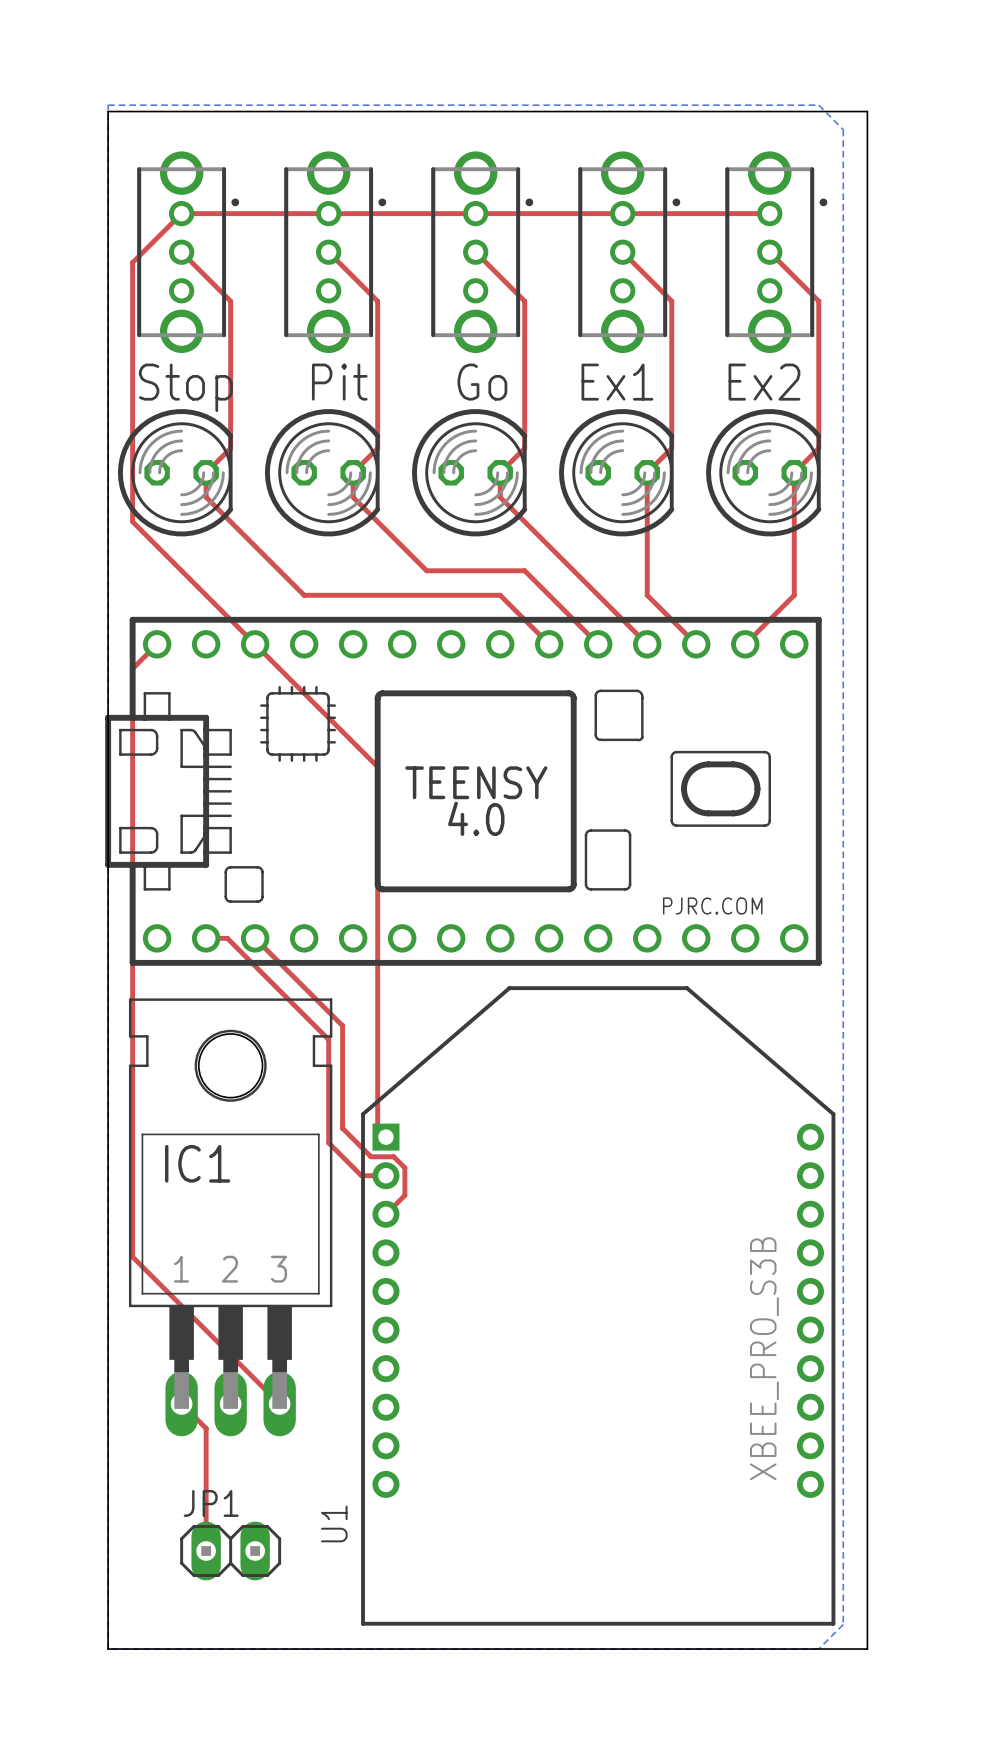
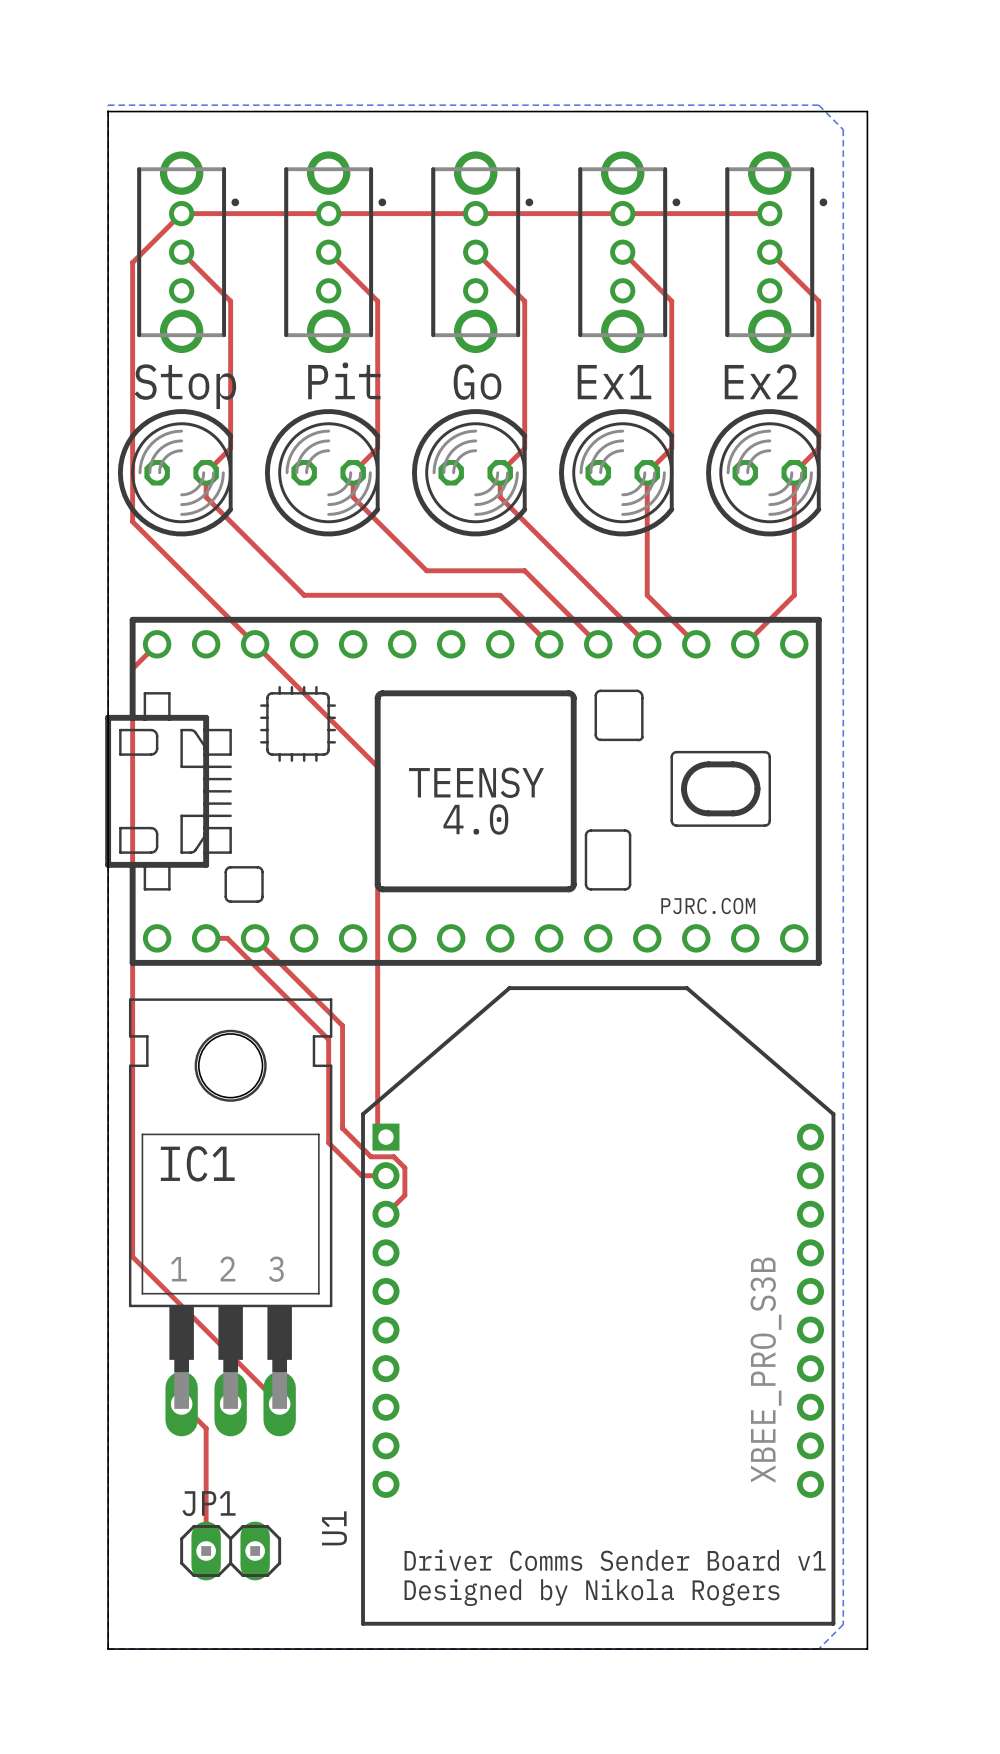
text: none -> Driver Comms Sender Board v1 (615, 1560)
text: none -> Designed by Nikola Rogers (592, 1592)

